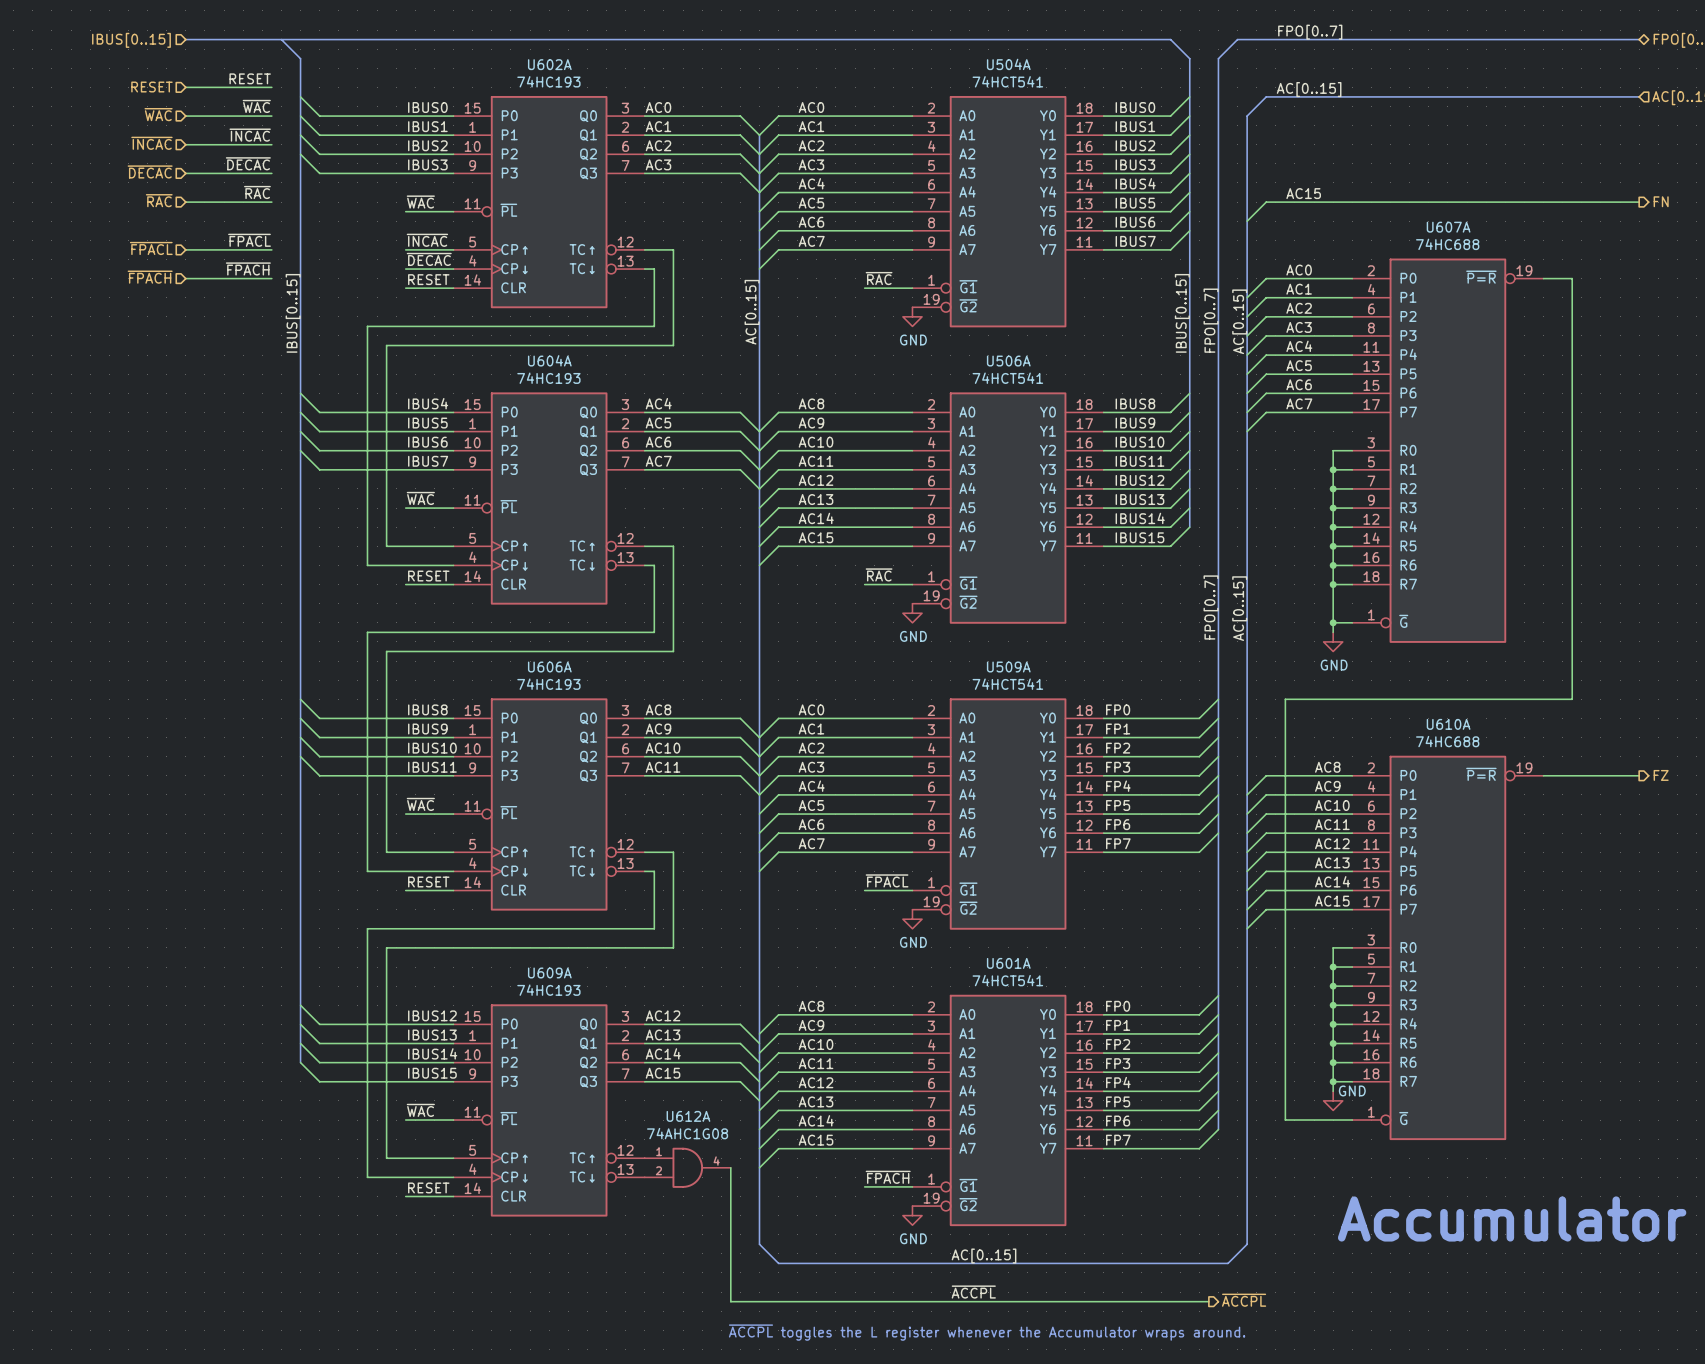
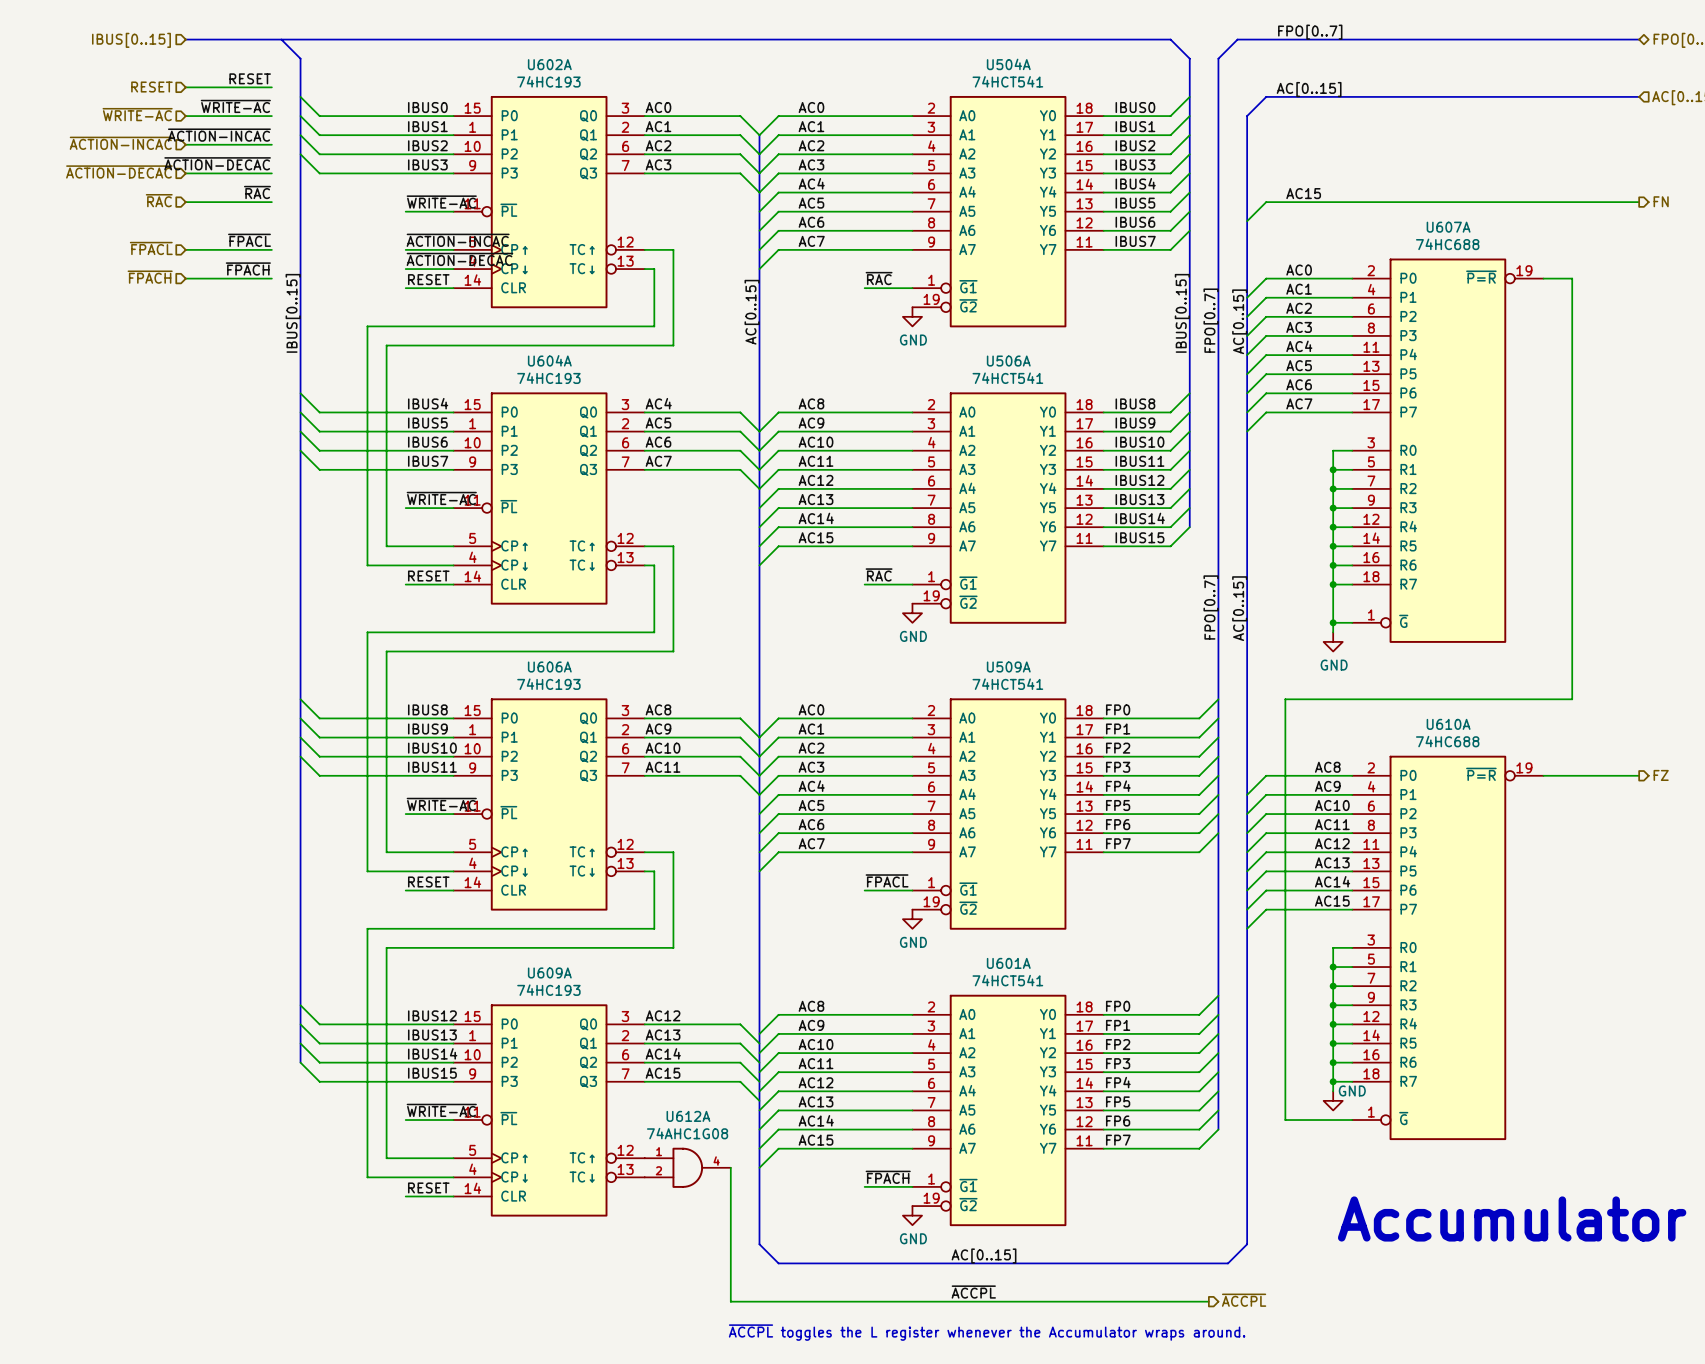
label: ~{WAC} (256, 106) -> ~{WRITE-AC} (235, 106)
hierarchical label: ~{WAC} (158, 114) -> ~{WRITE-AC} (137, 114)
label: ~{INCAC} (250, 135) -> ~{ACTION-INCAC} (219, 135)
hierarchical label: ~{INCAC} (151, 143) -> ~{ACTION-INCAC} (121, 143)
label: ~{DECAC} (248, 163) -> ~{ACTION-DECAC} (217, 163)
hierarchical label: ~{DECAC} (150, 171) -> ~{ACTION-DECAC} (119, 171)
label: ~{WAC} (420, 202) -> ~{WRITE-AC} (441, 202)
label: ~{INCAC} (427, 240) -> ~{ACTION-INCAC} (458, 240)
label: ~{DECAC} (429, 259) -> ~{ACTION-DECAC} (459, 259)
label: ~{WAC} (420, 498) -> ~{WRITE-AC} (441, 498)
label: ~{WAC} (420, 804) -> ~{WRITE-AC} (441, 804)
label: ~{WAC} (420, 1110) -> ~{WRITE-AC} (441, 1110)

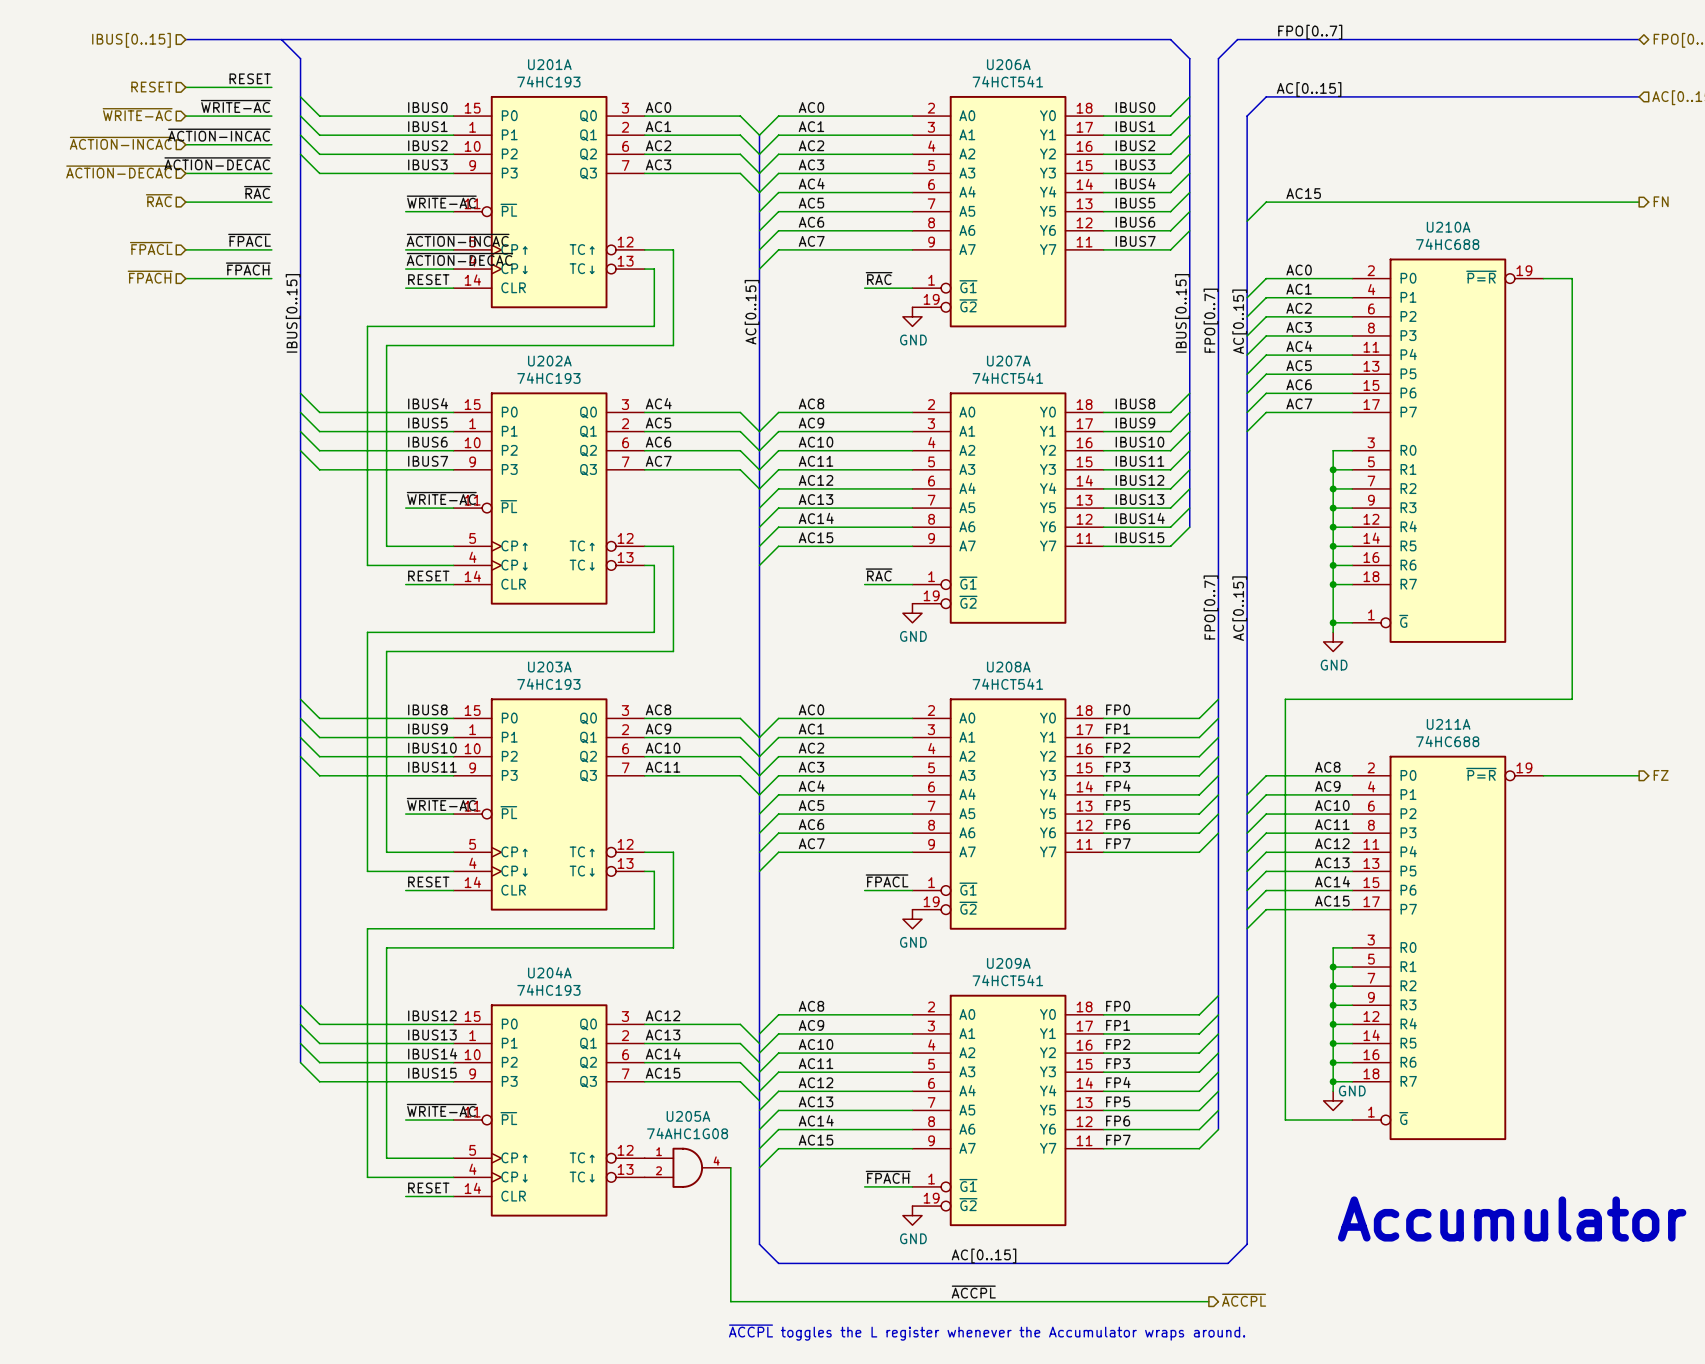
U602A name: U602A (549, 64) -> U201A (549, 64)
U504A name: U504A (1008, 64) -> U206A (1008, 64)
U607A name: U607A (1448, 227) -> U210A (1448, 227)
U604A name: U604A (549, 360) -> U202A (549, 361)
U506A name: U506A (1008, 361) -> U207A (1008, 361)
U606A name: U606A (549, 667) -> U203A (549, 667)
U509A name: U509A (1008, 667) -> U208A (1008, 667)
U610A name: U610A (1448, 724) -> U211A (1448, 724)
U601A name: U601A (1008, 963) -> U209A (1008, 963)
U609A name: U609A (549, 972) -> U204A (549, 972)
U612A name: U612A (688, 1116) -> U205A (688, 1116)

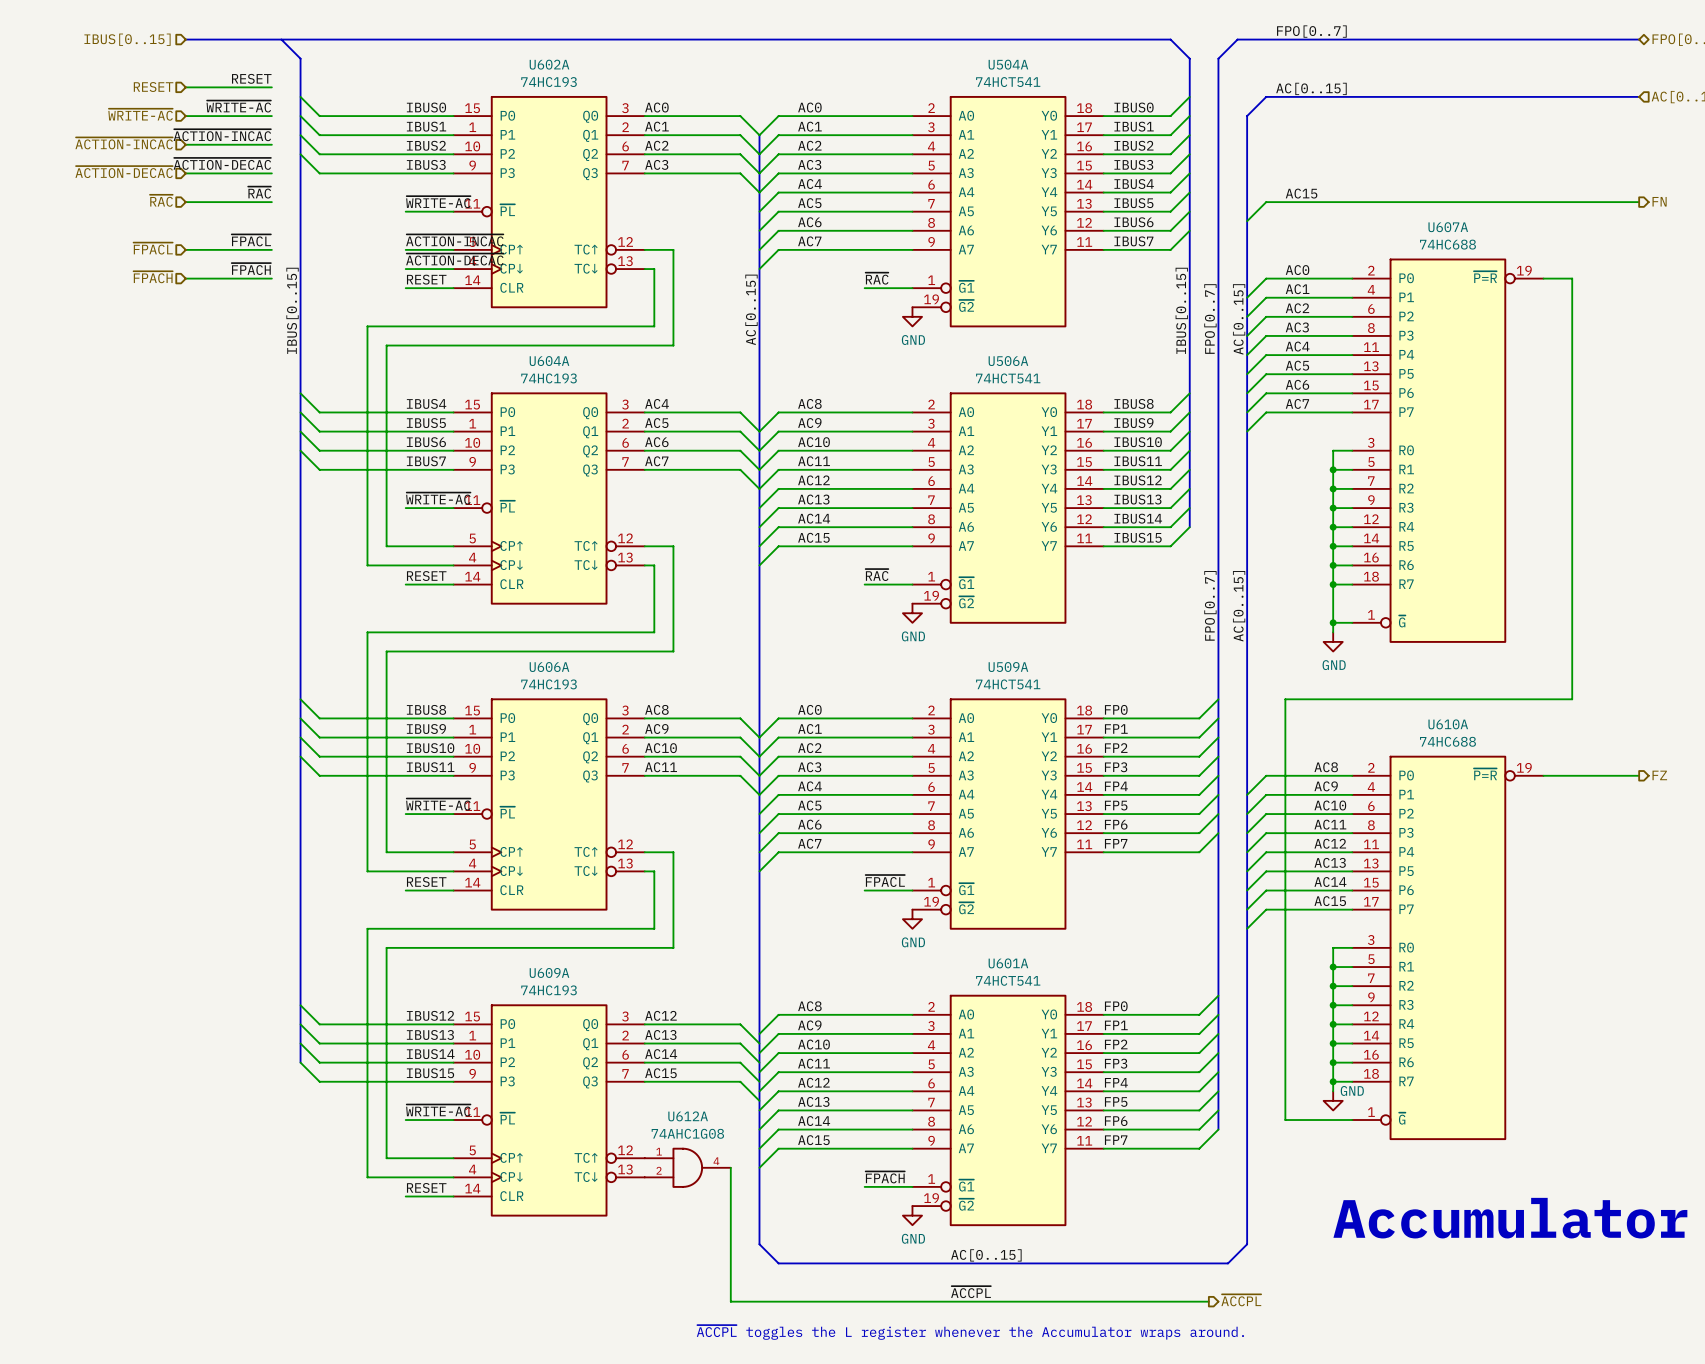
U201A name: U201A (549, 64) -> U602A (549, 64)
U206A name: U206A (1008, 64) -> U504A (1008, 64)
U210A name: U210A (1448, 227) -> U607A (1448, 227)
U202A name: U202A (549, 361) -> U604A (549, 361)
U207A name: U207A (1008, 361) -> U506A (1008, 361)
U203A name: U203A (549, 667) -> U606A (549, 667)
U208A name: U208A (1008, 667) -> U509A (1008, 667)
U211A name: U211A (1448, 724) -> U610A (1448, 724)
U209A name: U209A (1008, 963) -> U601A (1008, 963)
U204A name: U204A (549, 972) -> U609A (549, 972)
U205A name: U205A (688, 1116) -> U612A (688, 1116)

